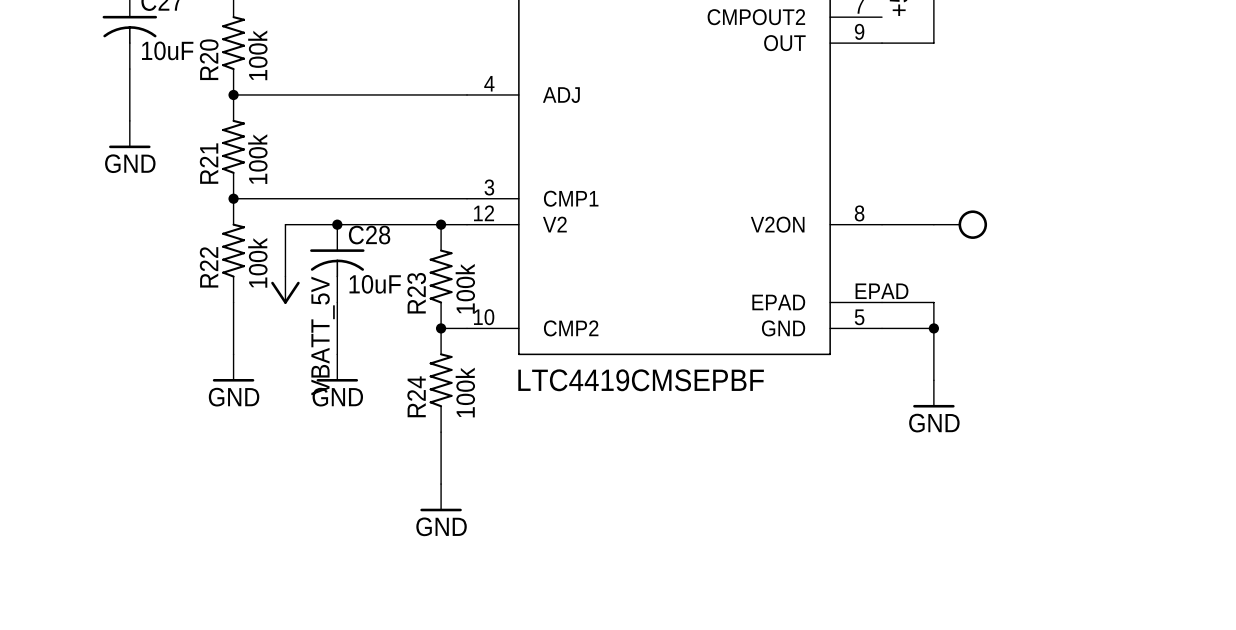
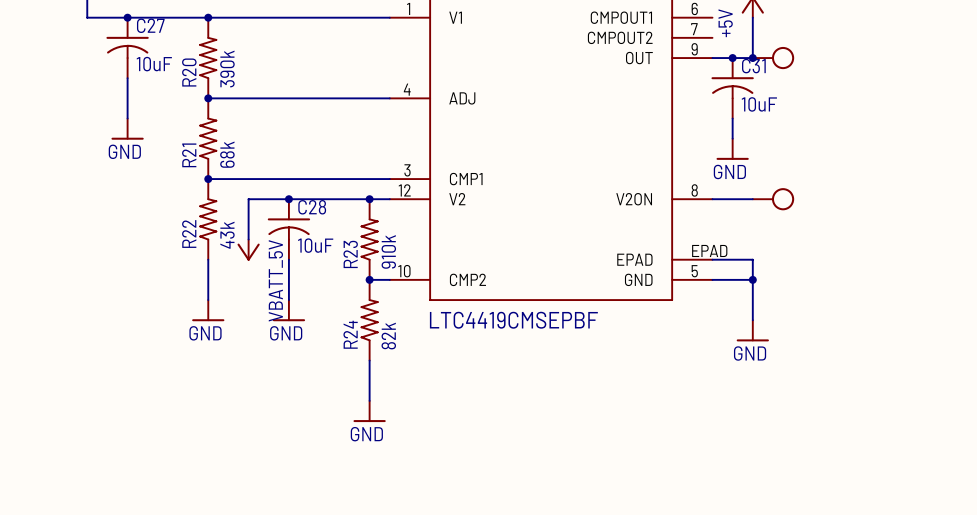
junction: none -> (732, 58)
junction: none -> (752, 58)
part: none -> (773, 58)
R20 value: 100k (257, 55) -> 390k (227, 69)
C31: none -> 10uF (732, 88)
wire: none -> (732, 118) (732, 138)
R21 value: 100k (257, 159) -> 68k (227, 154)
power symbol: none -> GND (732, 149)
R22 value: 100k (257, 262) -> 43k (227, 235)
R23 value: 100k (465, 288) -> 910k (388, 251)
R24 value: 100k (465, 392) -> 82k (388, 336)

